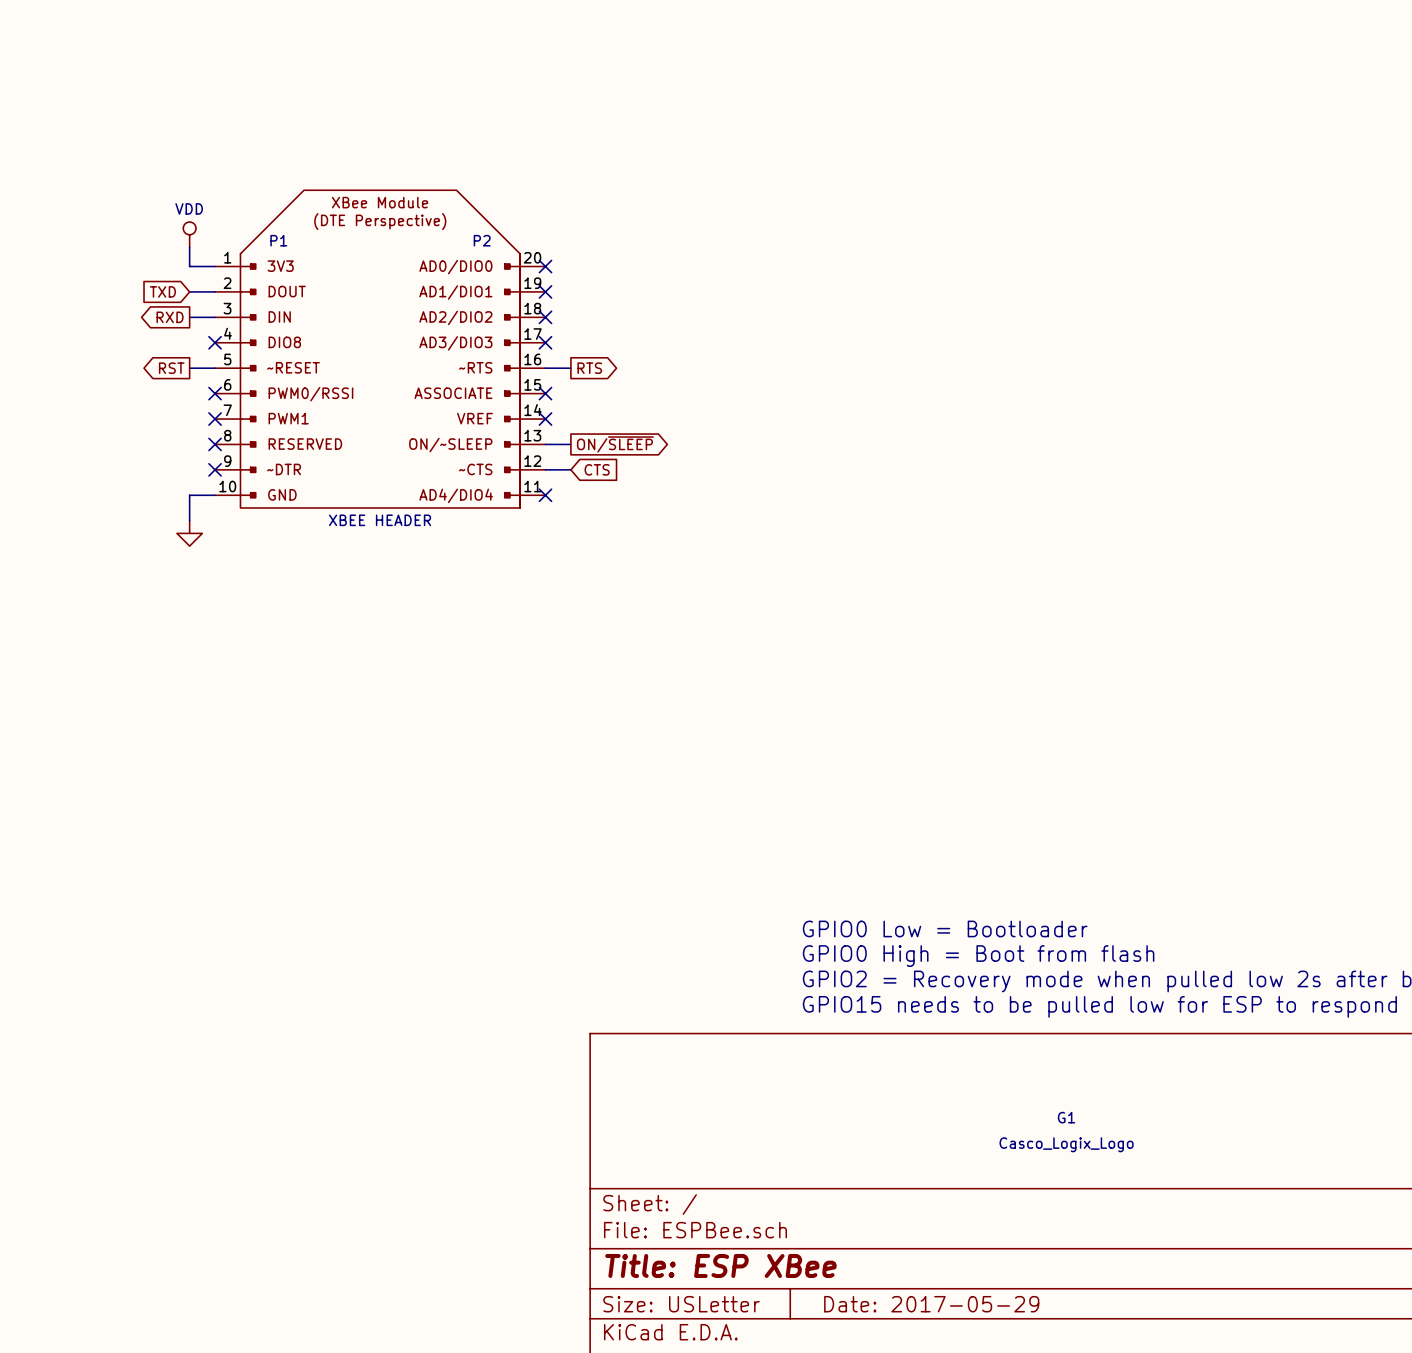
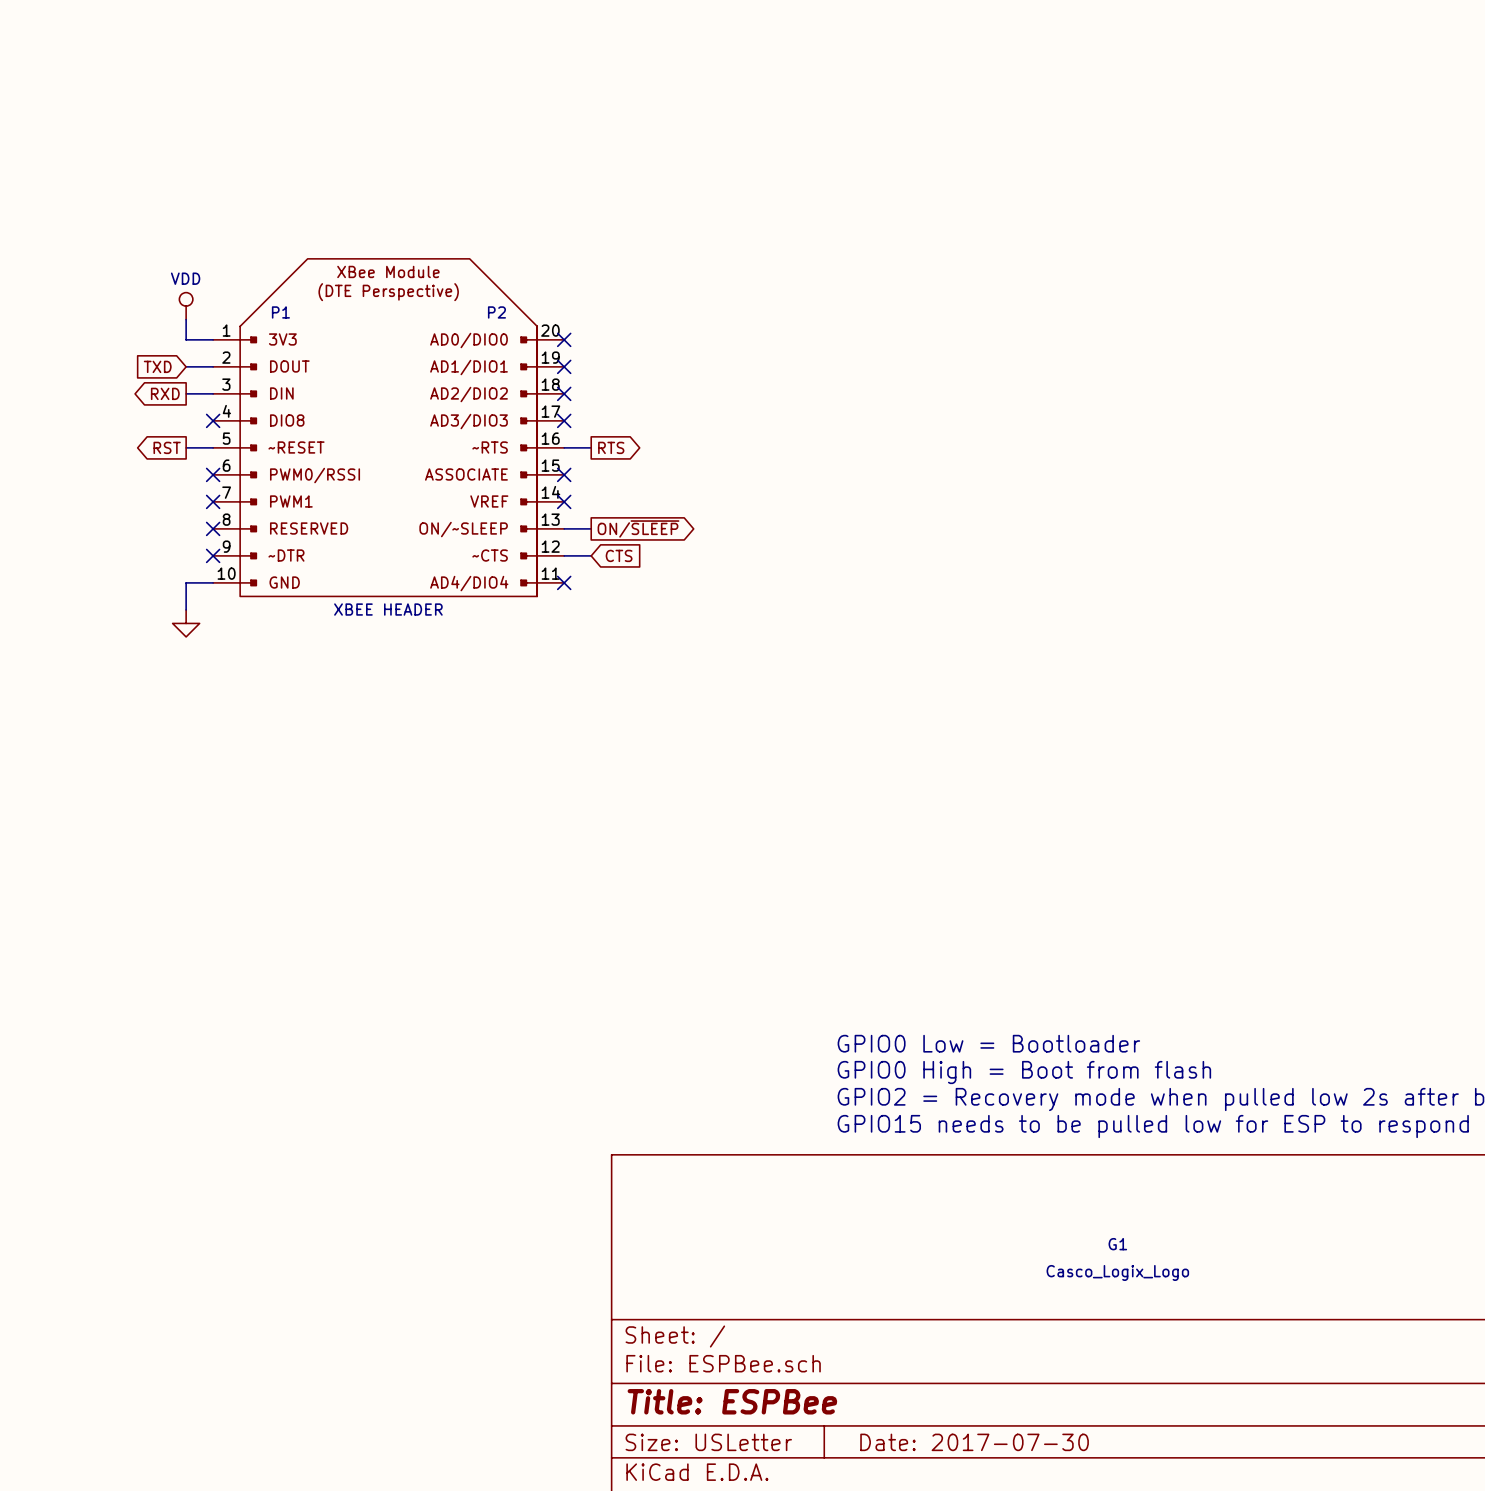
title block: Title: ESP XBee (720, 1265) -> Title: ESPBee (732, 1401)
title block: Date: 2017-05-29 (931, 1304) -> Date: 2017-07-30 (974, 1442)

